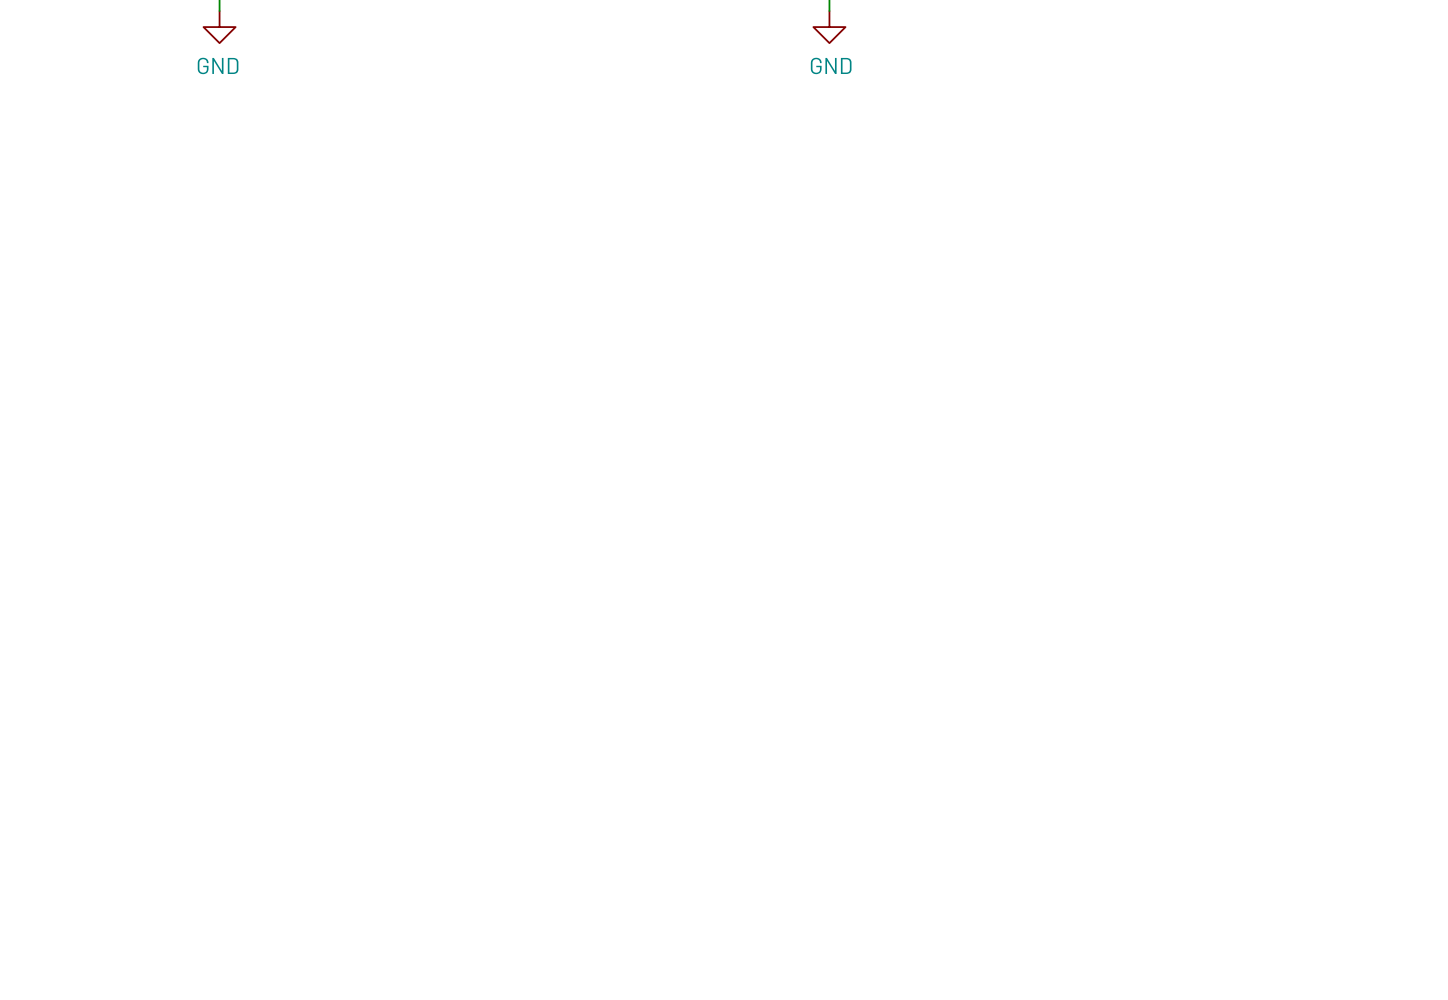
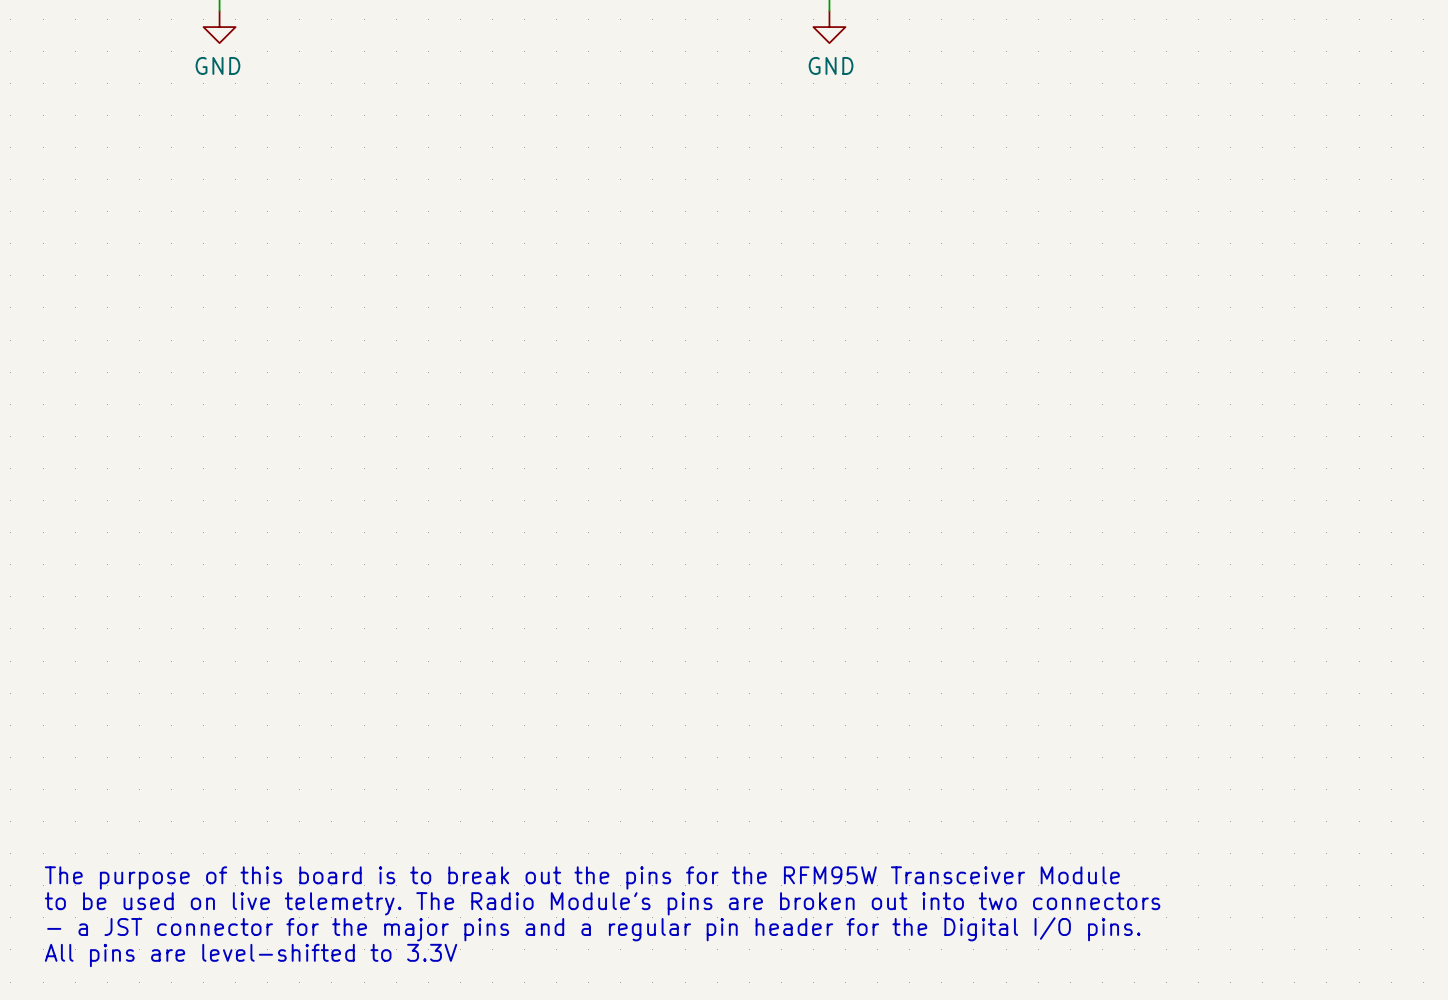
text: none -> The purpose of this board is to break out the pins for the RFM95W Transceiver Module (582, 877)
text: none -> to be used on live telemetry. The Radio Module's pins are broken out into two connectors (602, 903)
text: none -> - a JST connector for the major pins and a regular pin header for the Digital I/O pins. (593, 929)
text: none -> All pins are level-shifted to 3.3V (251, 955)

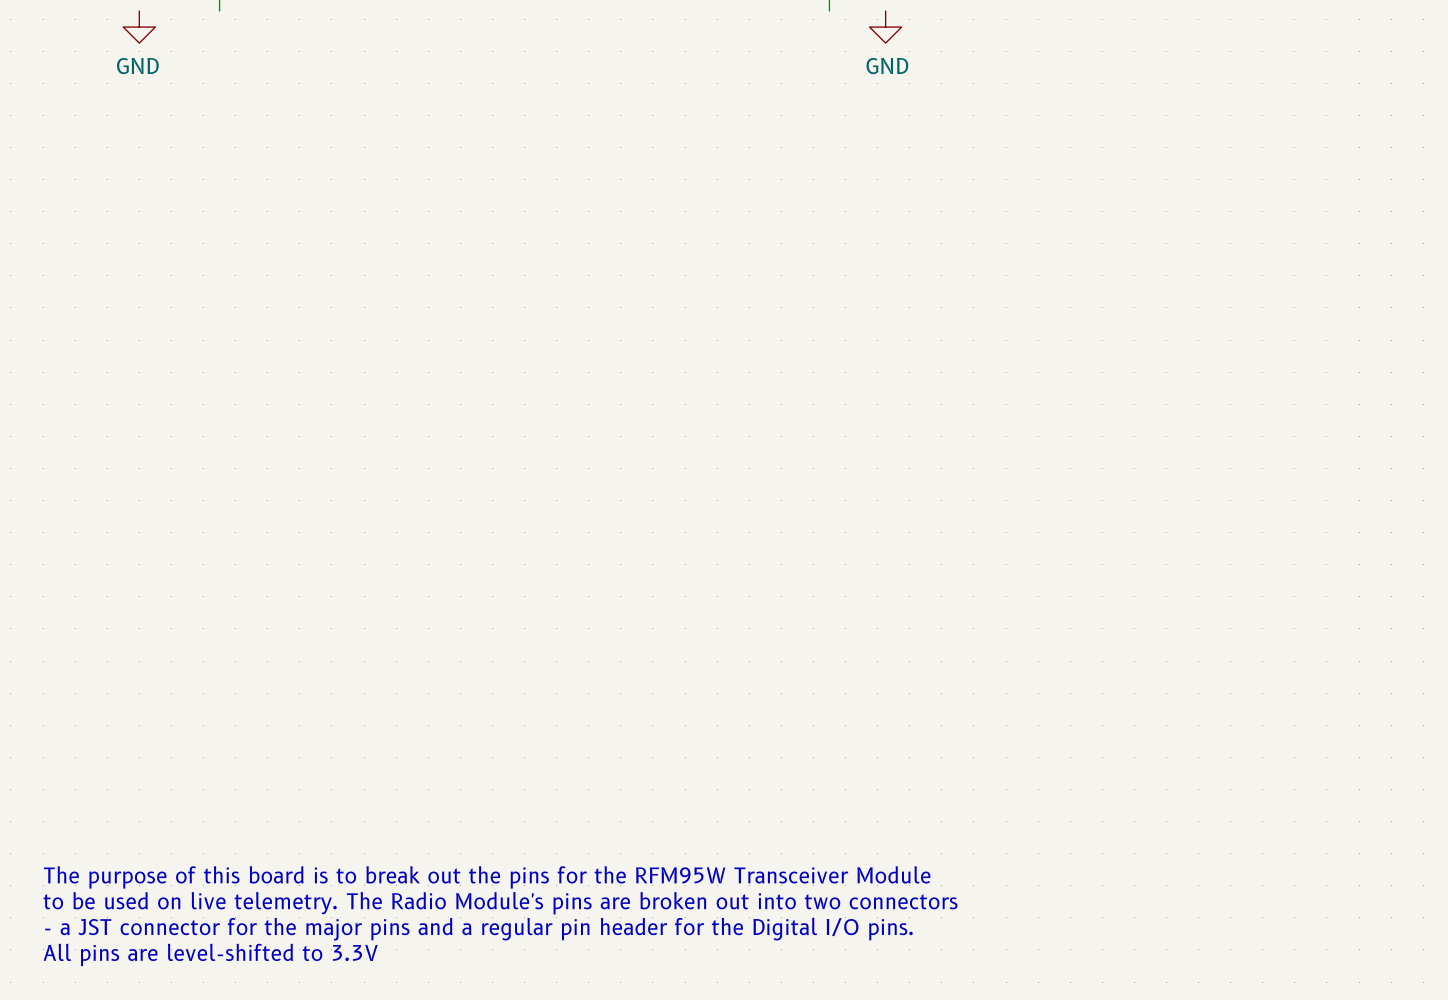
power symbol position: GND (219, 27) -> GND (139, 27)
power symbol position: GND (829, 27) -> GND (885, 27)

